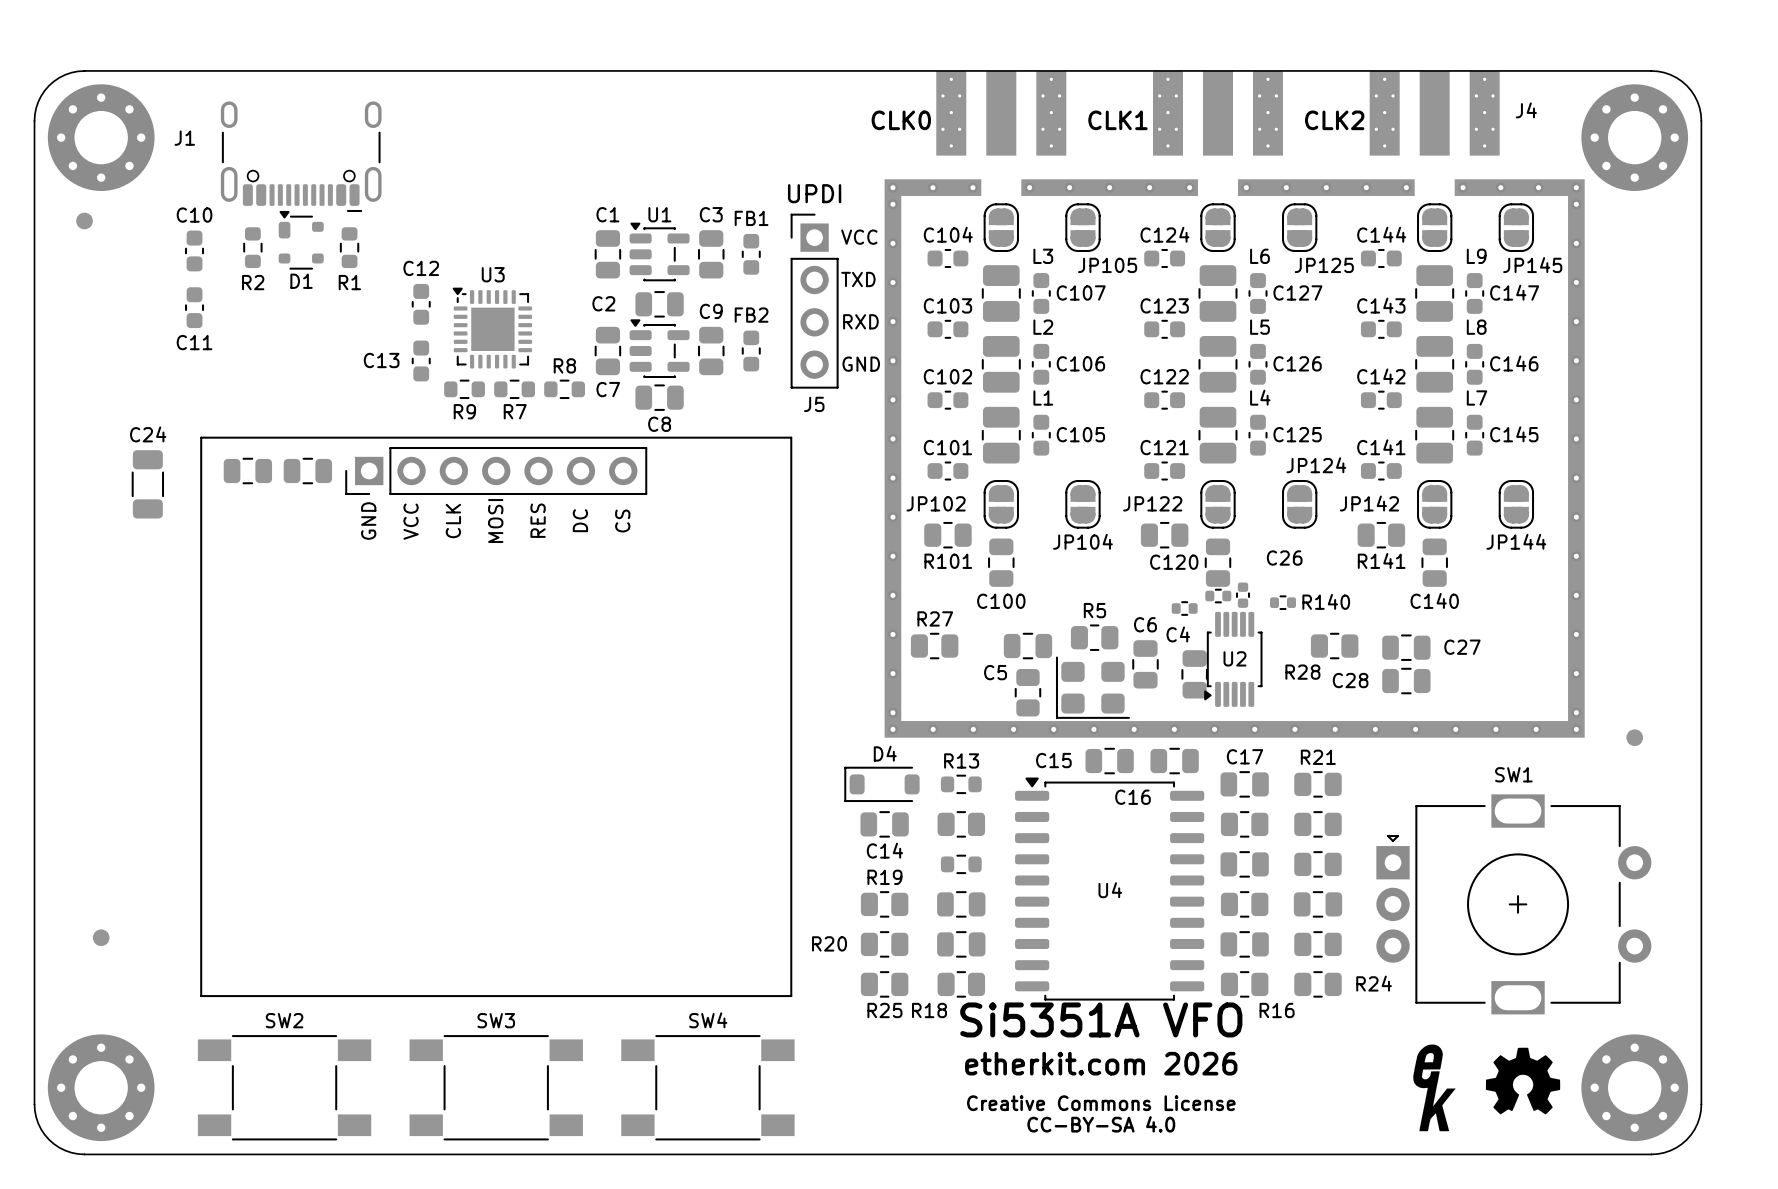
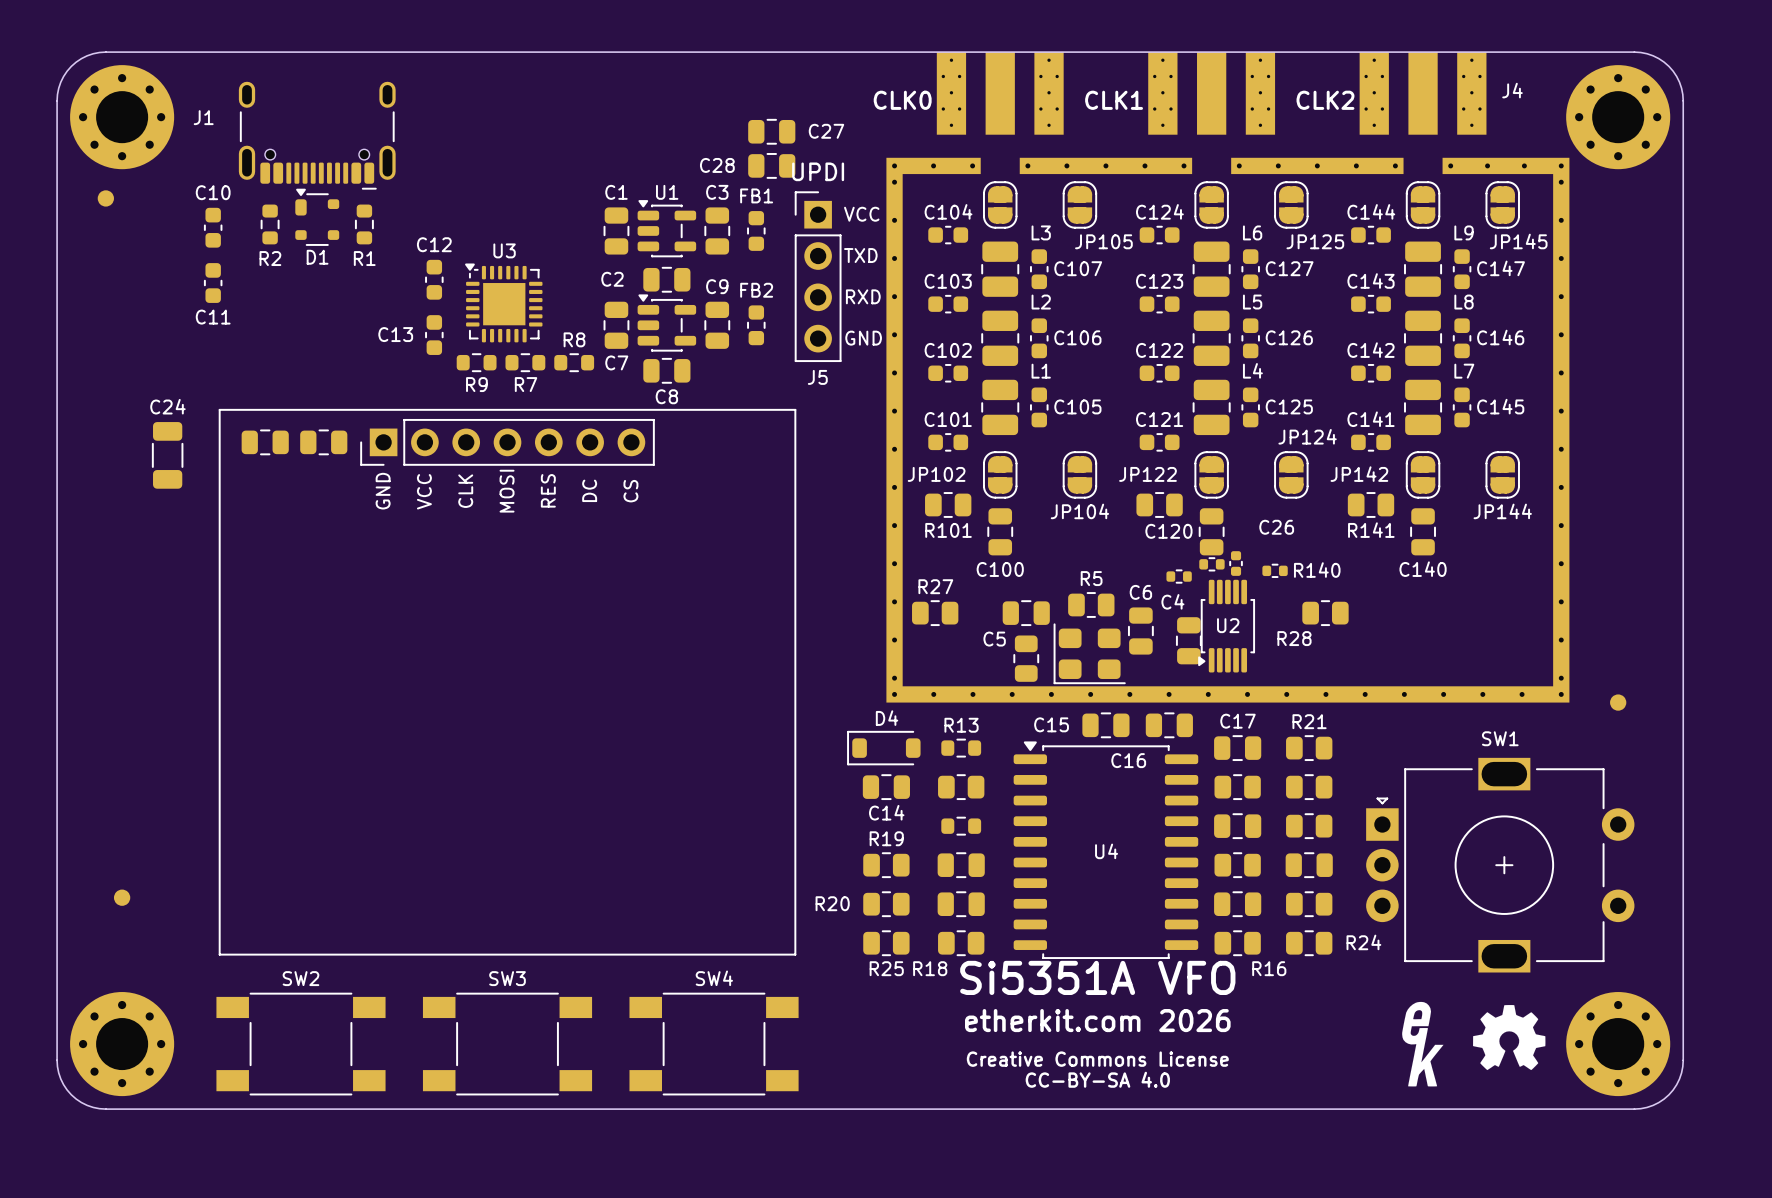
C27 position: (1406, 647) -> (771, 131)
C28 position: (1406, 681) -> (771, 165)

